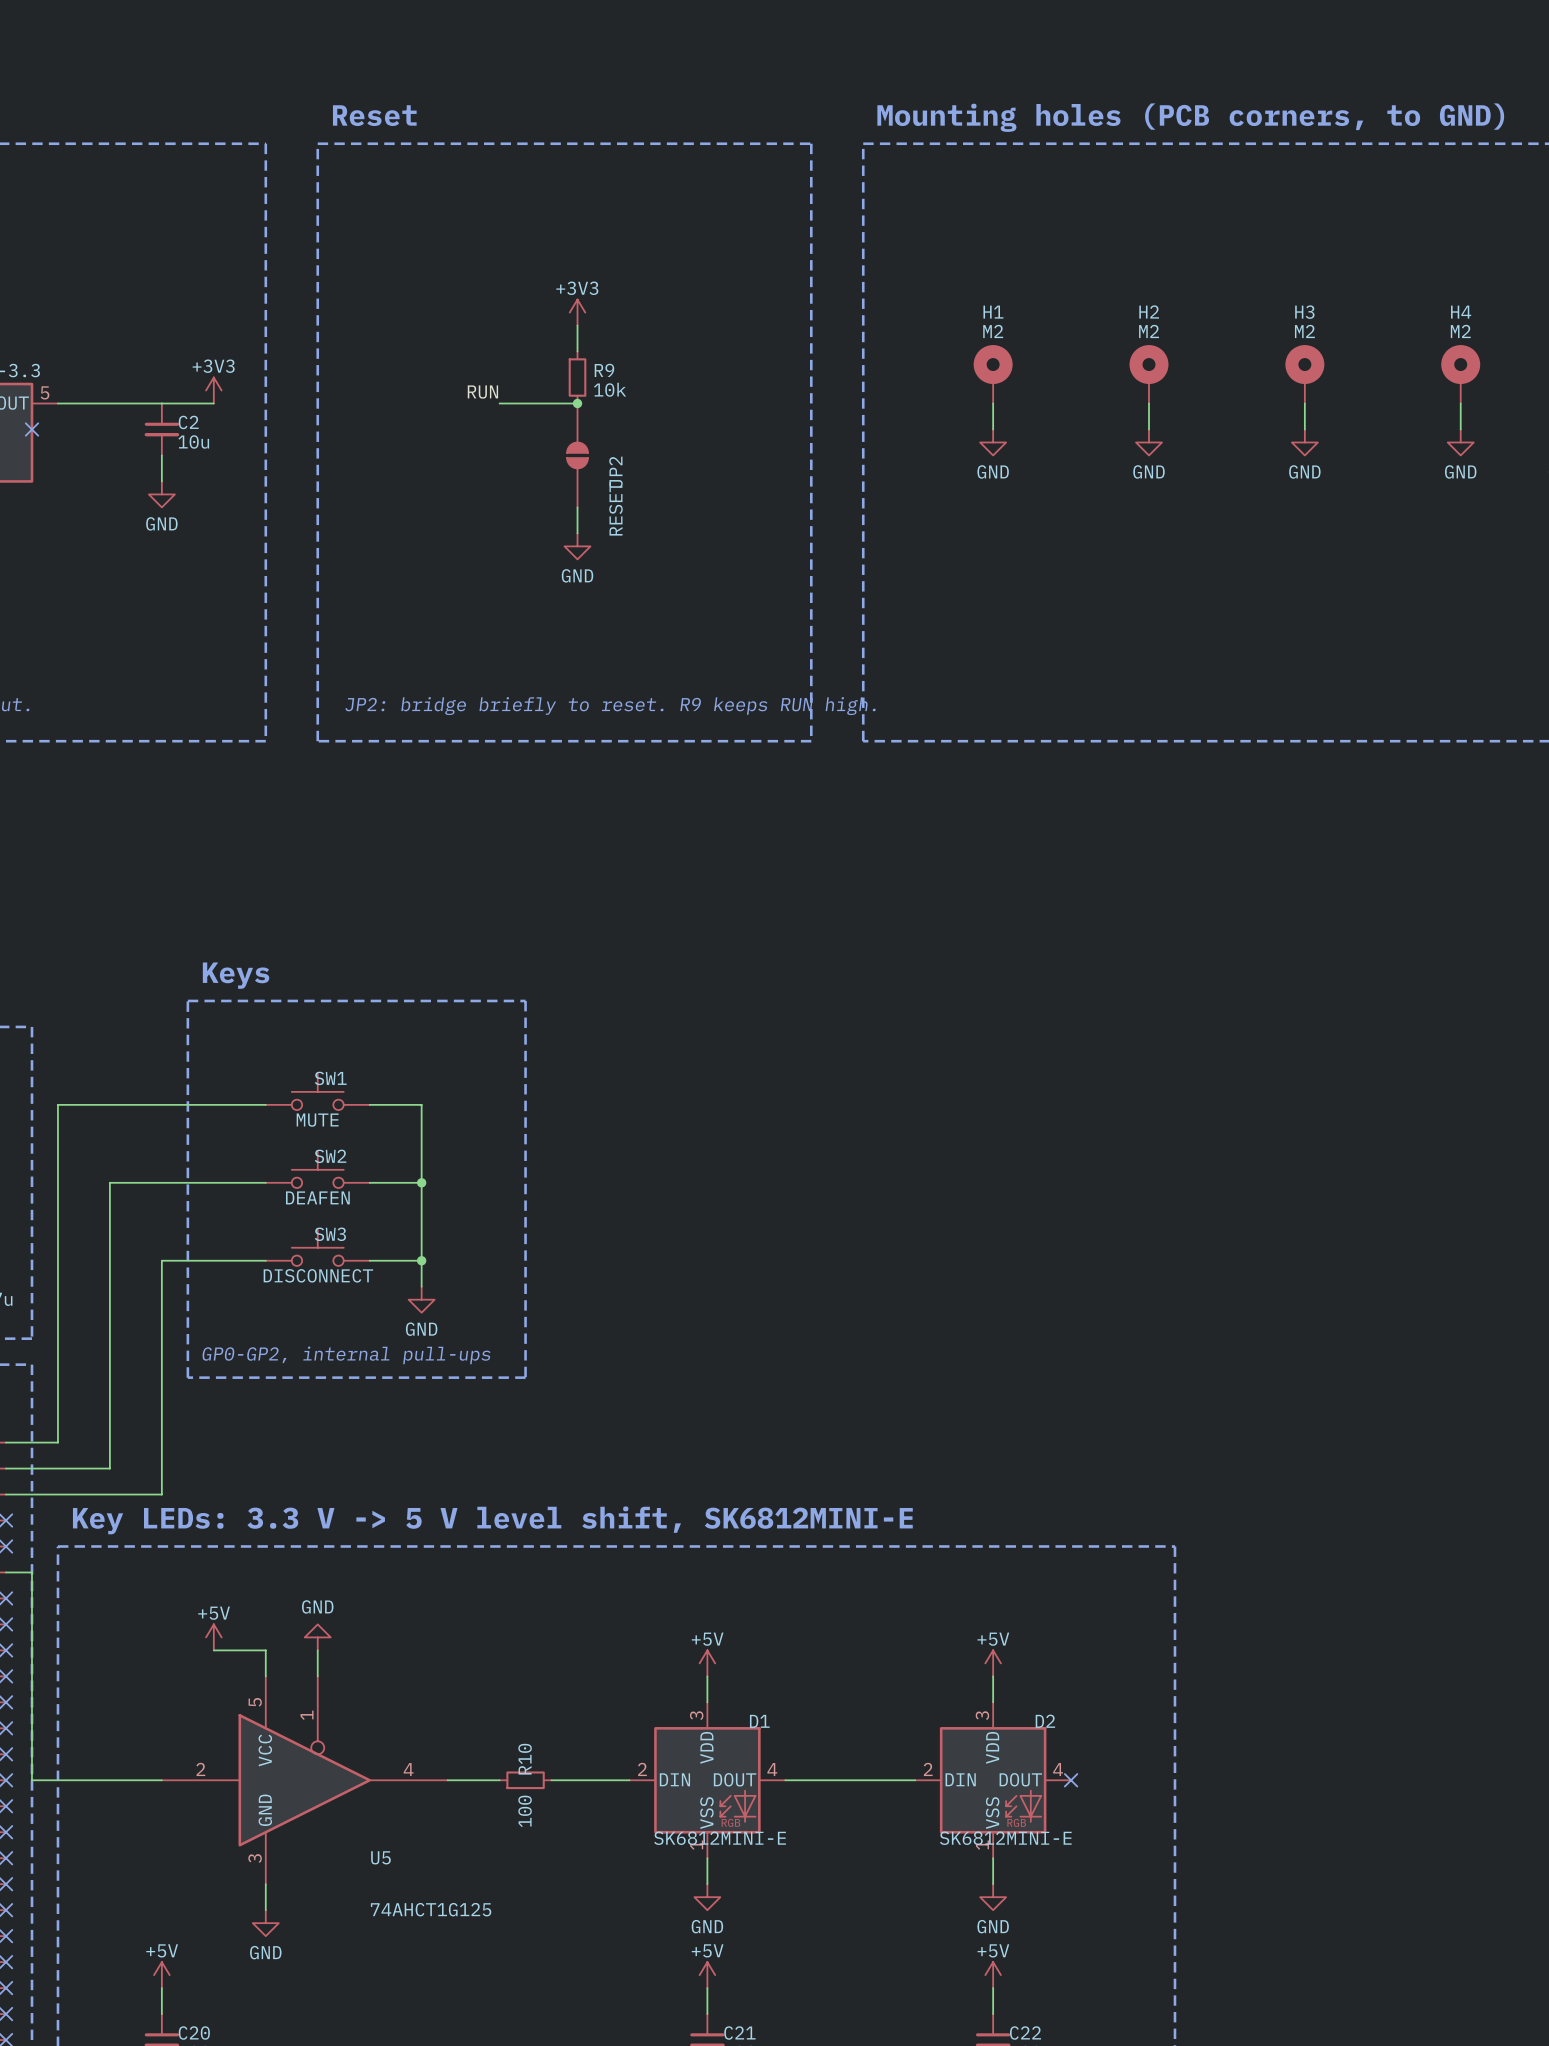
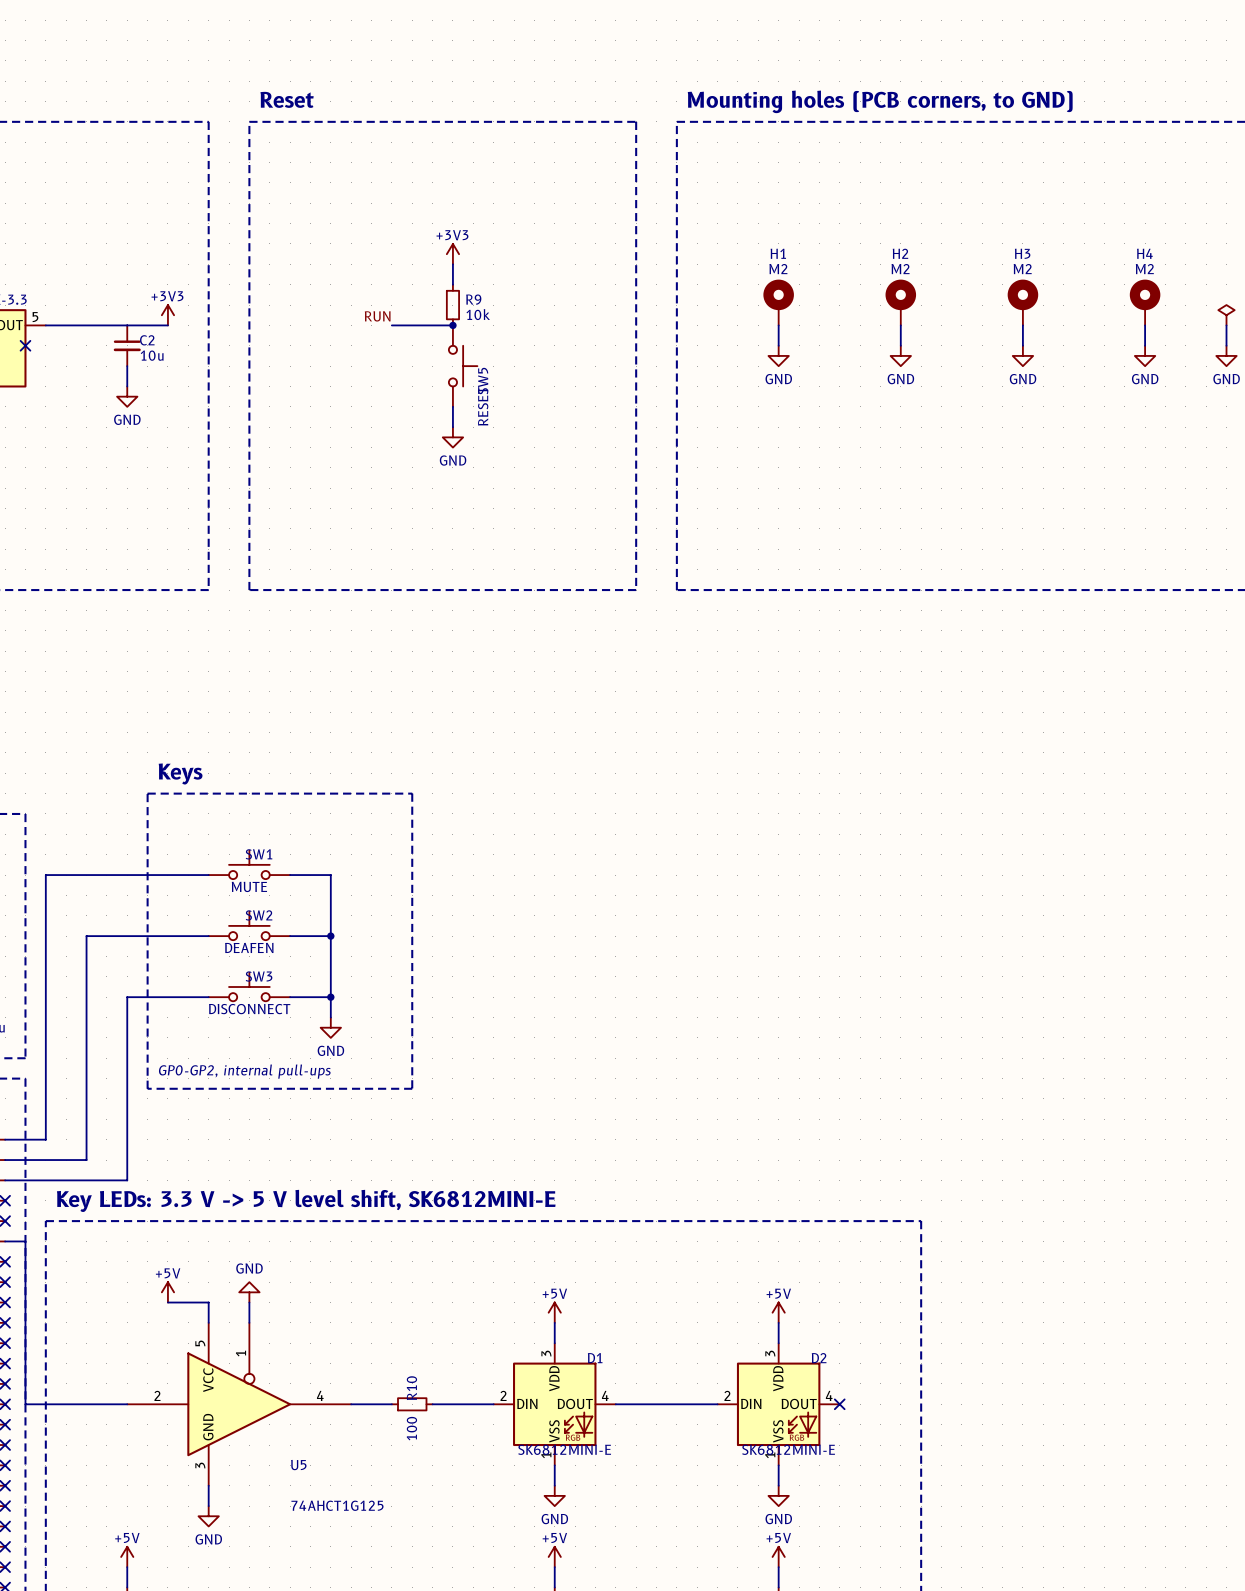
JP2: RESET (577, 455) -> none
SW5: none -> RESET (463, 366)
text: JP2: bridge briefly to reset. R9 keeps RUN high. (610, 706) -> none

